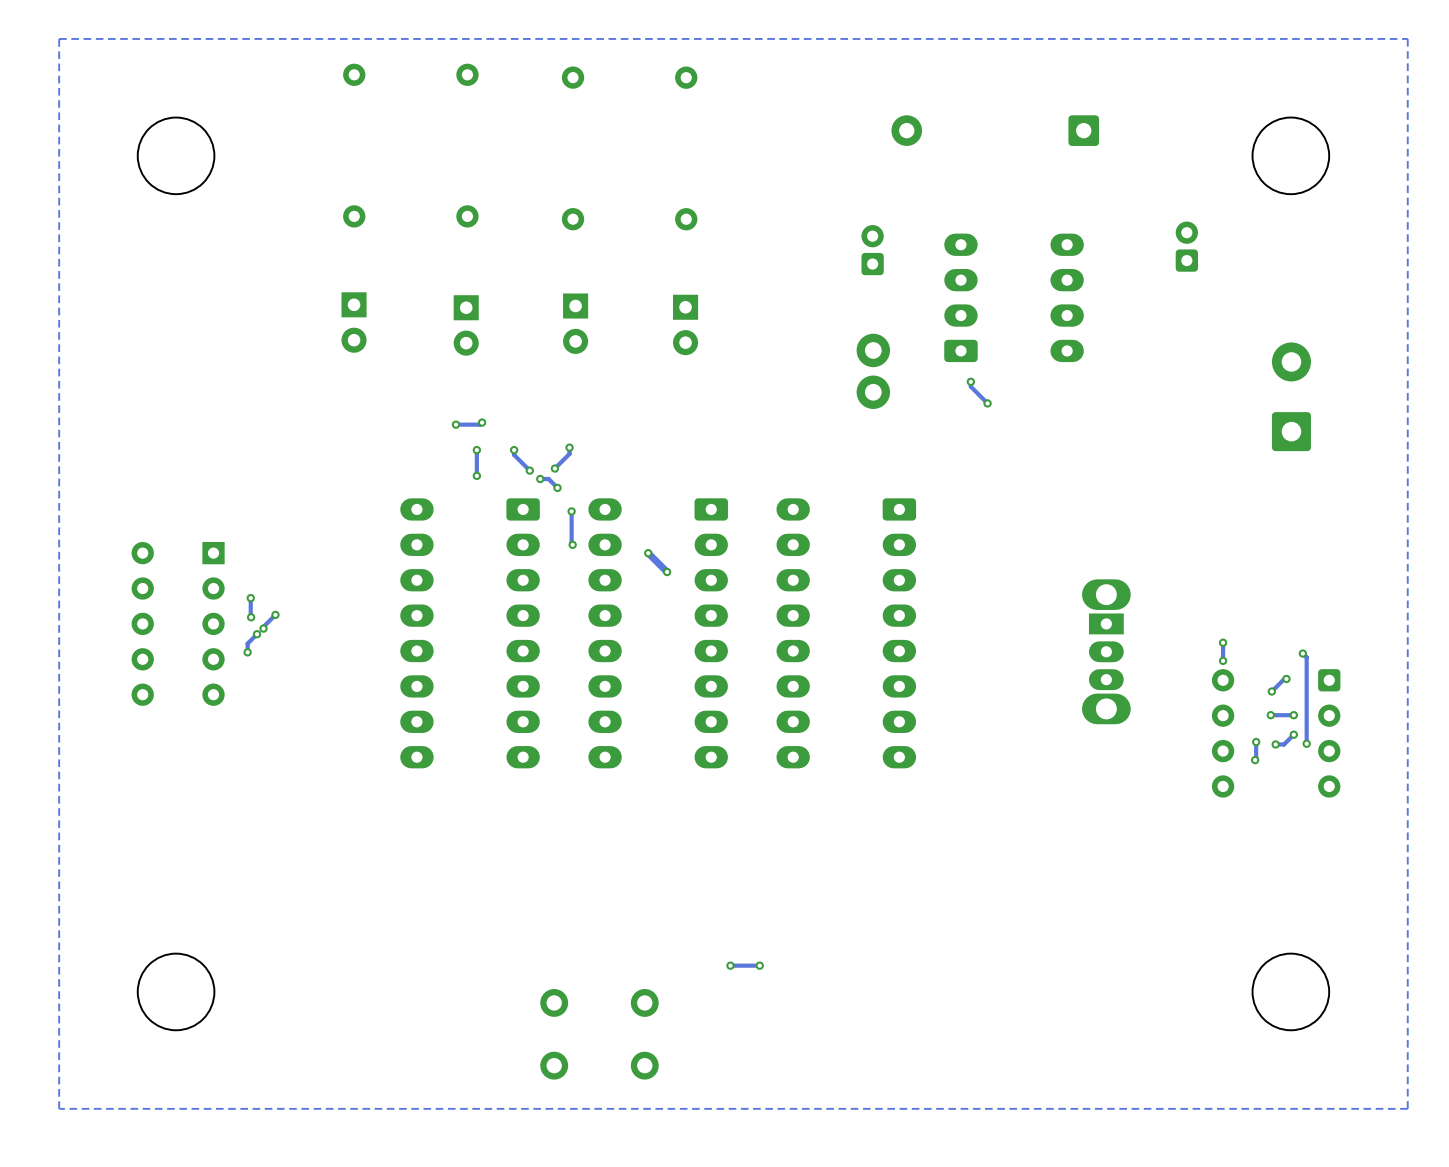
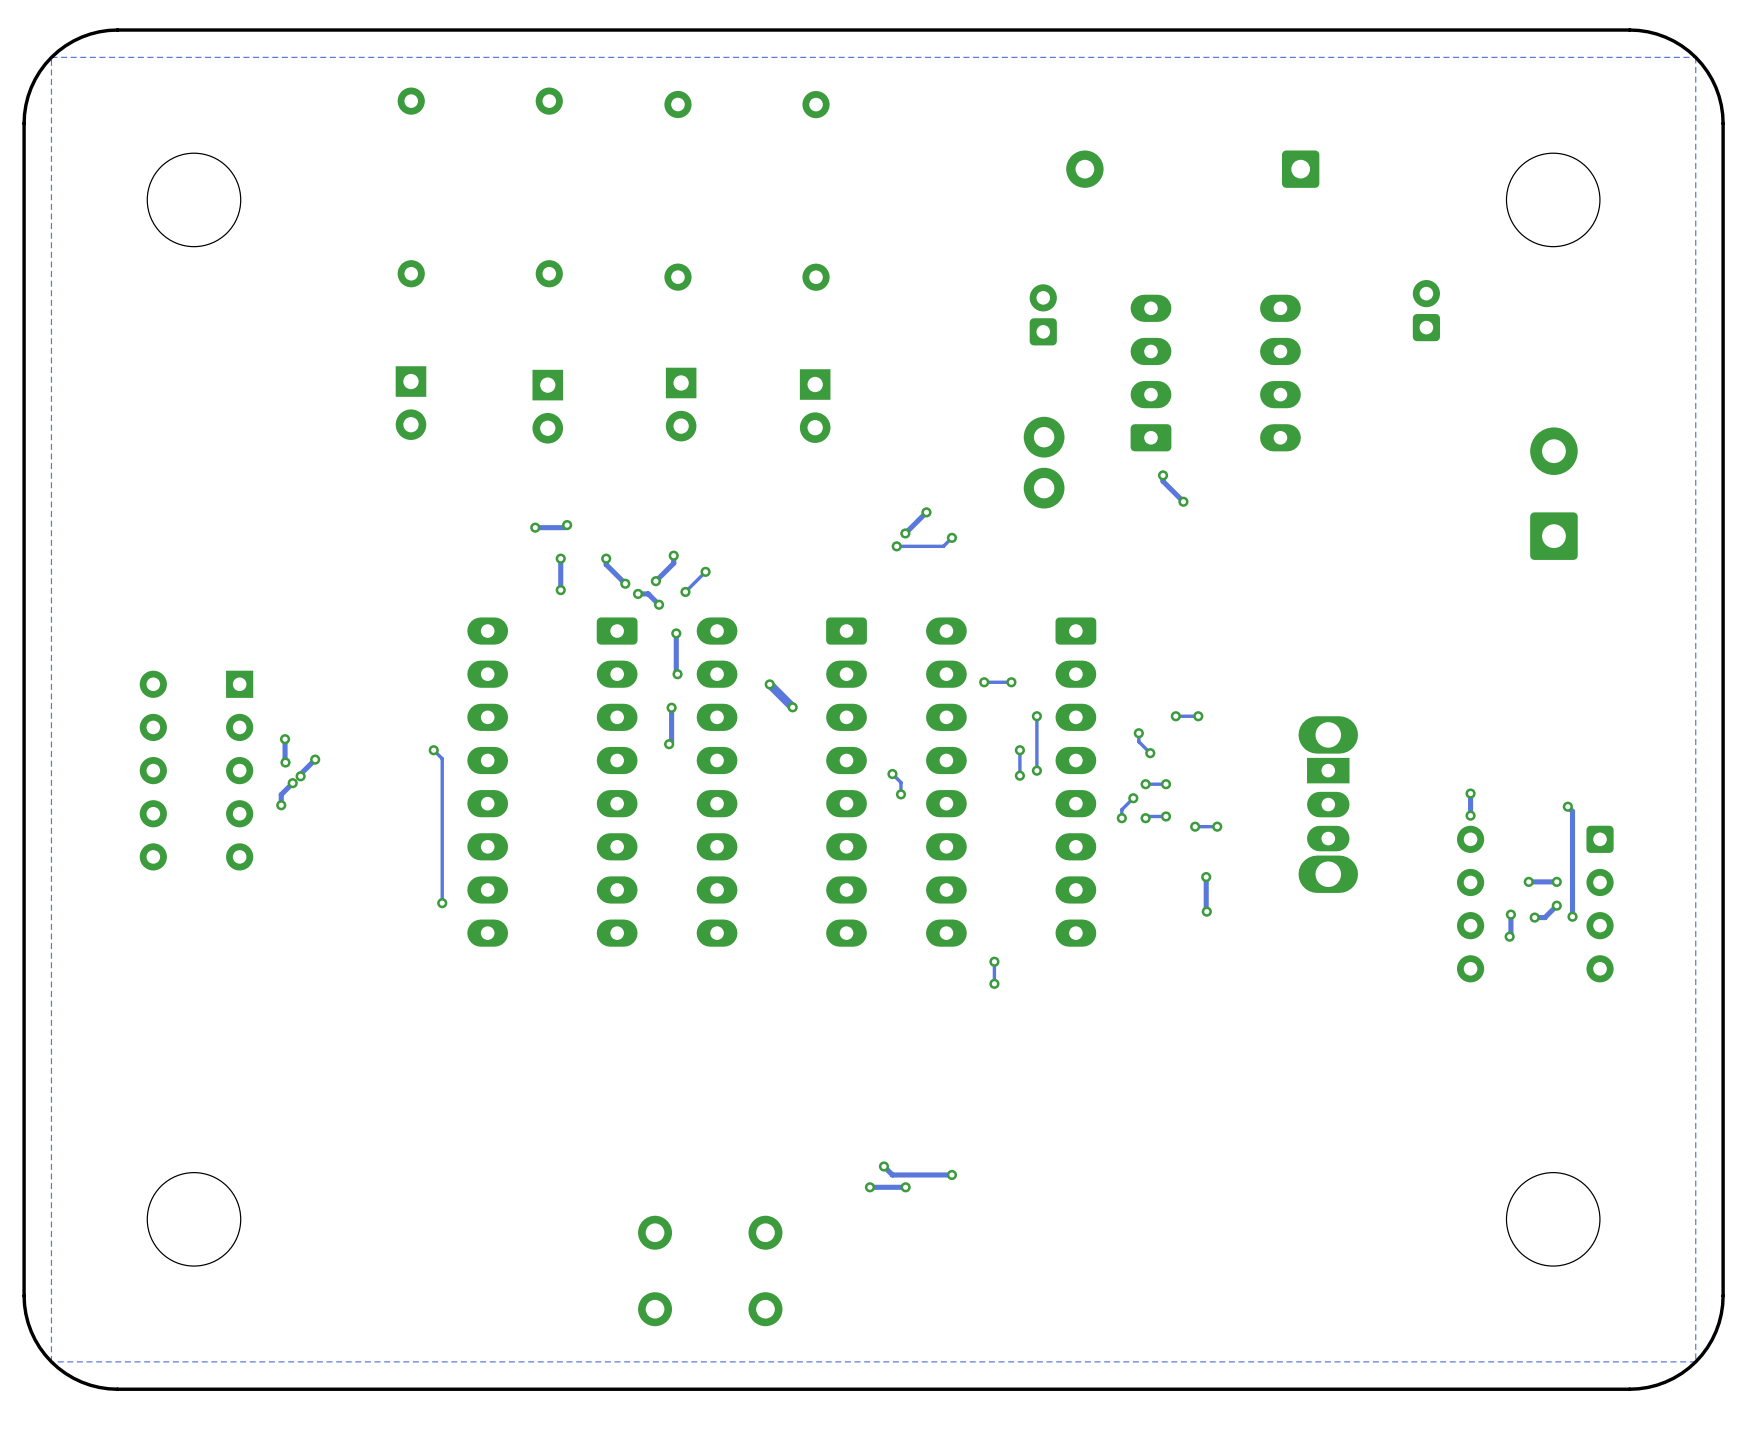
board edge: none -> (1629, 30) (117, 30) (90, 34) (73, 41) (58, 51) (39, 71) (31, 87) (25, 105) (24, 123) (24, 1295) (28, 1322) (35, 1339) (45, 1355) (58, 1368) (73, 1378) (90, 1385) (117, 1389) (1629, 1389) (1647, 1387) (1665, 1382) (1688, 1368) (1707, 1347) (1715, 1331) (1721, 1314) (1723, 1295) (1723, 123) (1721, 105) (1715, 87) (1707, 71) (1695, 57) (1681, 45) (1665, 37) (1647, 31) (1629, 30)
track: none -> (926, 512) (905, 533)
via: none -> (926, 512)
via: none -> (905, 533)
track: none -> (951, 537) (943, 546) (896, 546)
via: none -> (951, 537)
via: none -> (896, 546)
track: none -> (705, 571) (685, 591)
via: none -> (705, 571)
via: none -> (685, 591)
via: none -> (984, 682)
track: none -> (1011, 682) (984, 682)
via: none -> (1011, 682)
track: none -> (671, 707) (671, 741) (669, 744)
via: none -> (671, 707)
track: none -> (1036, 716) (1036, 770)
via: none -> (1036, 716)
via: none -> (1175, 716)
track: none -> (1198, 716) (1175, 716)
via: none -> (1198, 716)
track: none -> (1138, 733) (1138, 741) (1150, 753)
via: none -> (1138, 733)
via: none -> (669, 744)
track: none -> (433, 750) (442, 758) (442, 903)
via: none -> (433, 750)
track: none -> (1019, 750) (1019, 775)
via: none -> (1019, 750)
via: none -> (1150, 753)
via: none -> (1036, 770)
track: none -> (892, 774) (900, 782) (900, 794)
via: none -> (892, 774)
via: none -> (1019, 775)
via: none -> (1145, 784)
track: none -> (1166, 784) (1145, 784)
via: none -> (1166, 784)
via: none -> (900, 794)
track: none -> (1133, 798) (1121, 809) (1121, 818)
via: none -> (1133, 798)
track: none -> (1166, 816) (1147, 816) (1145, 818)
via: none -> (1166, 816)
via: none -> (1121, 818)
via: none -> (1145, 818)
via: none -> (1195, 826)
track: none -> (1217, 826) (1195, 826)
via: none -> (1217, 826)
track: (1286, 678) (1271, 691) -> none
via: (1286, 678) -> none
via: (1271, 691) -> none
track: none -> (1206, 877) (1206, 911)
via: none -> (1206, 877)
via: none -> (442, 903)
via: none -> (1206, 911)
track: none -> (994, 961) (994, 983)
via: none -> (994, 961)
via: none -> (994, 983)
track: none -> (883, 1166) (892, 1174) (951, 1174)
via: none -> (883, 1166)
via: none -> (951, 1174)

